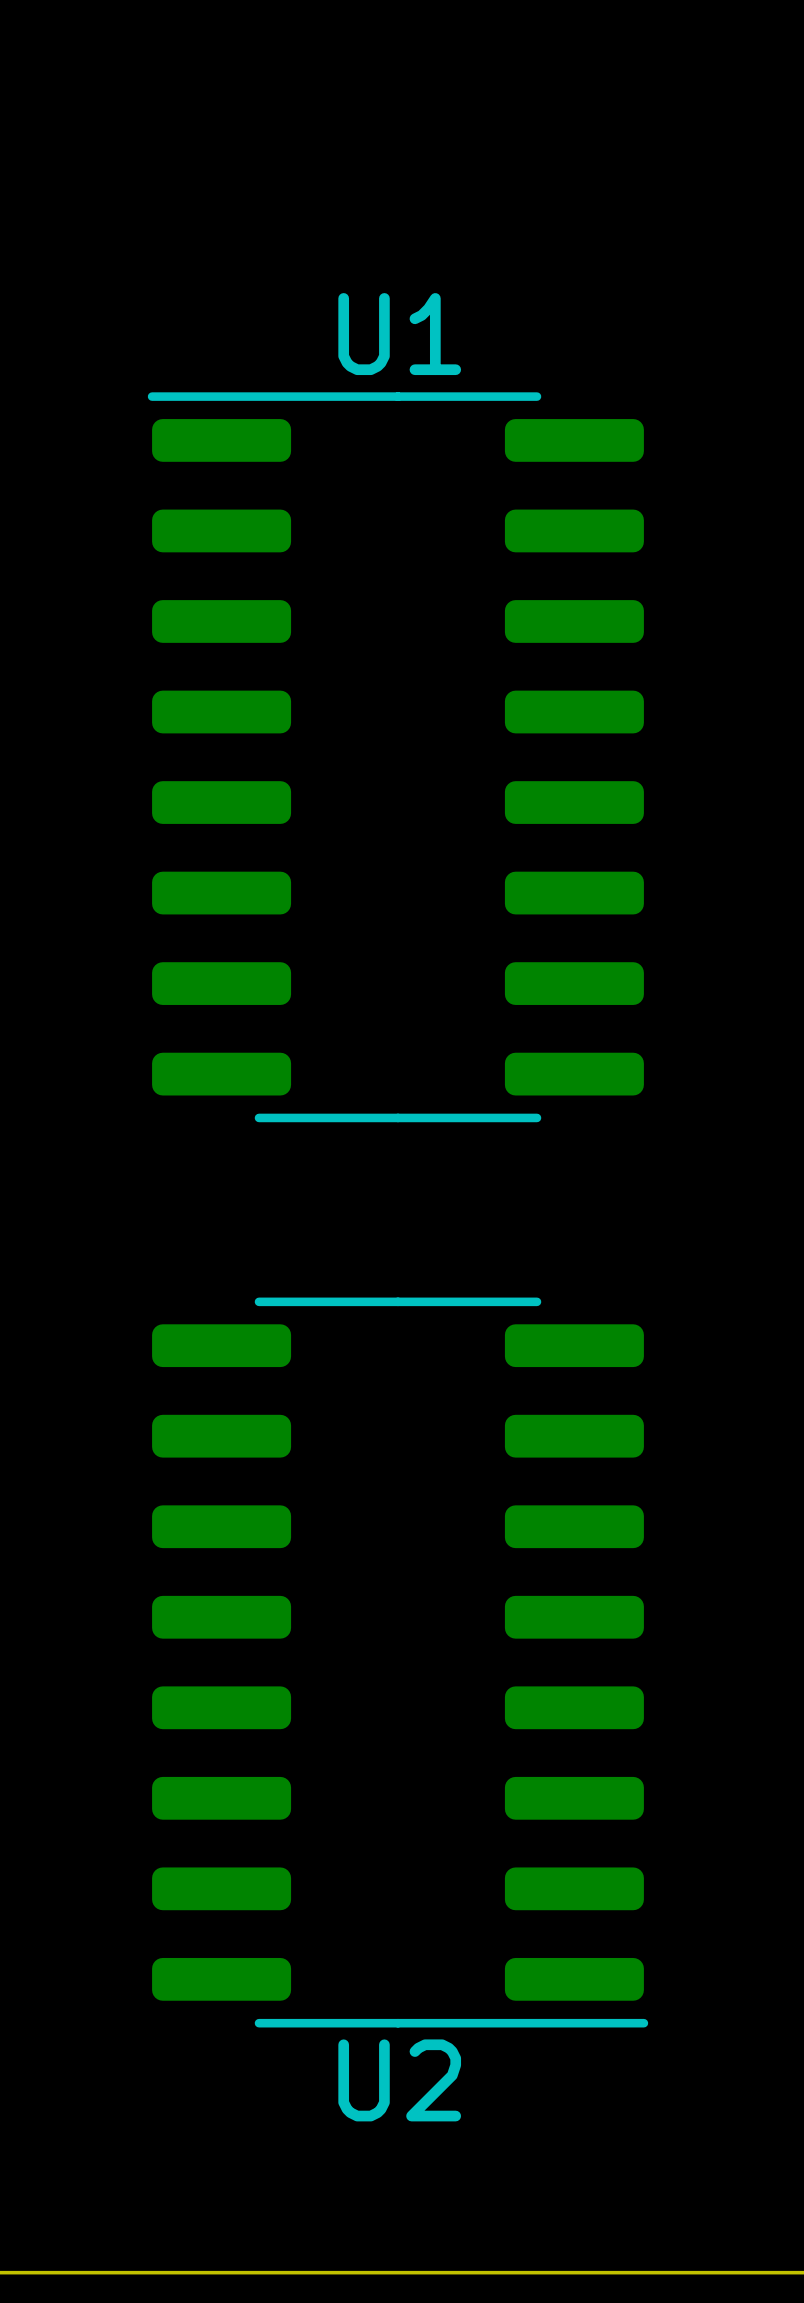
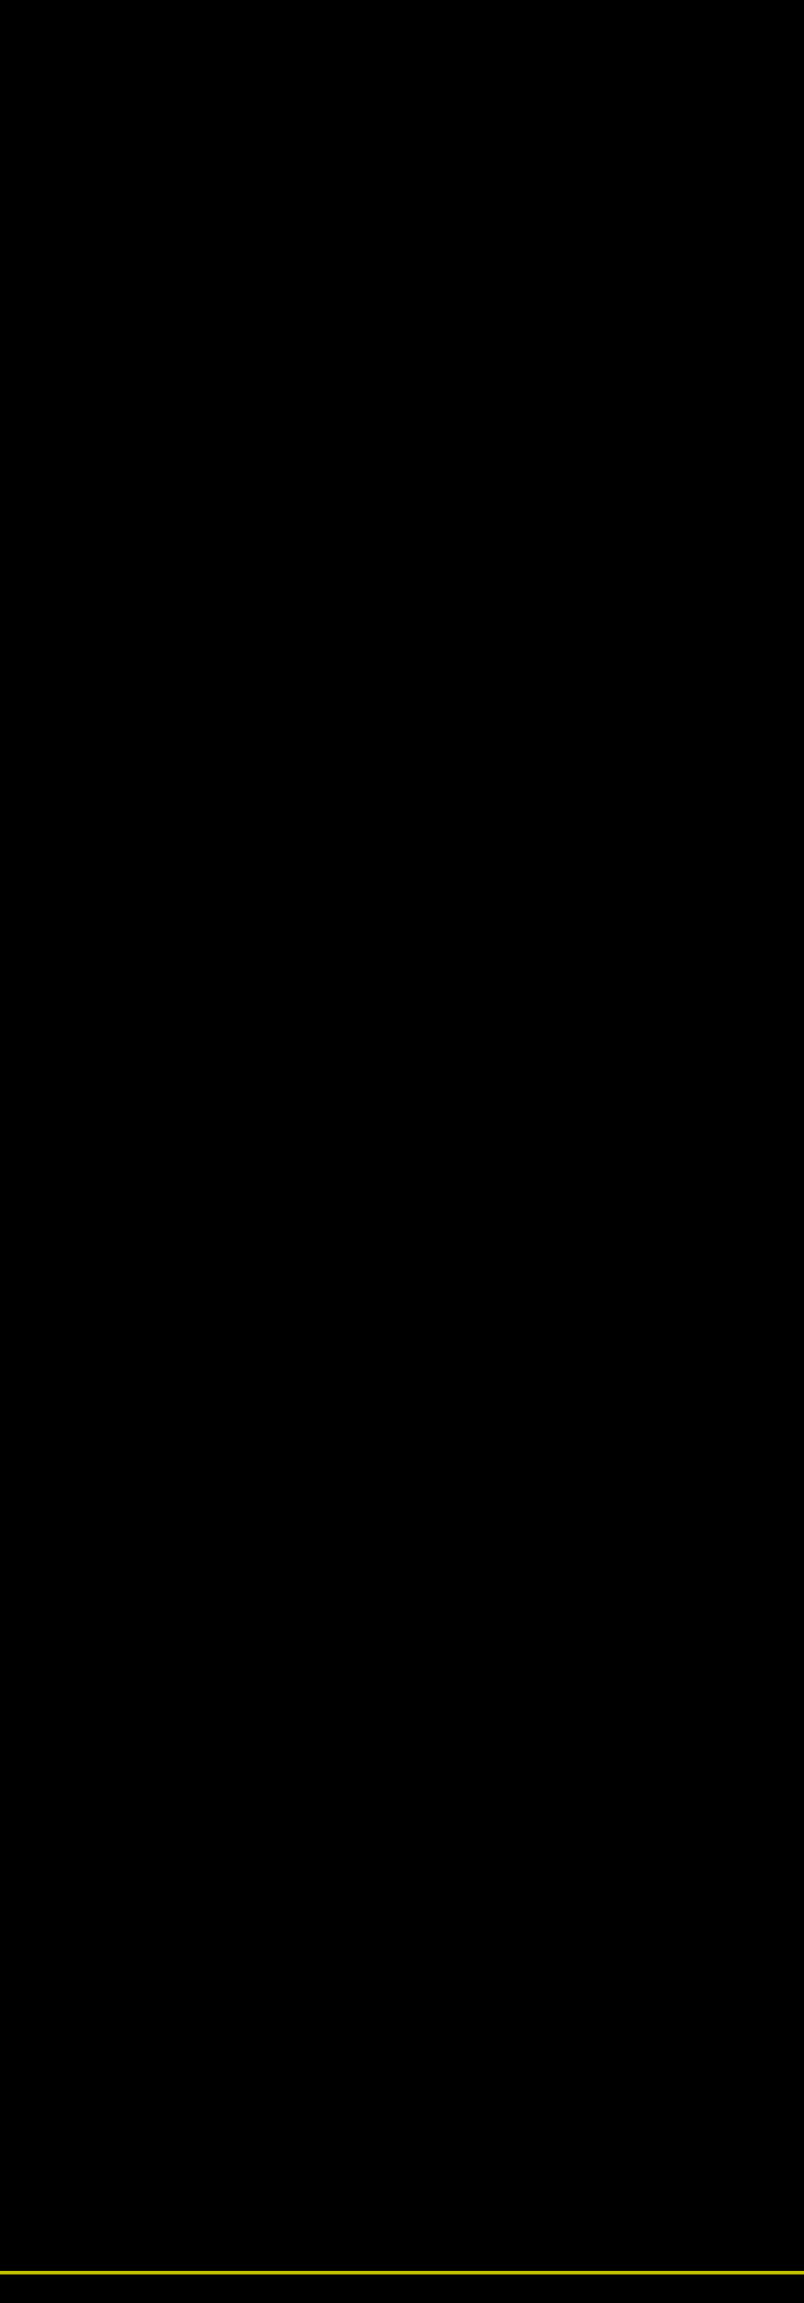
U1: (395, 757) -> none
U2: (400, 1662) -> none

